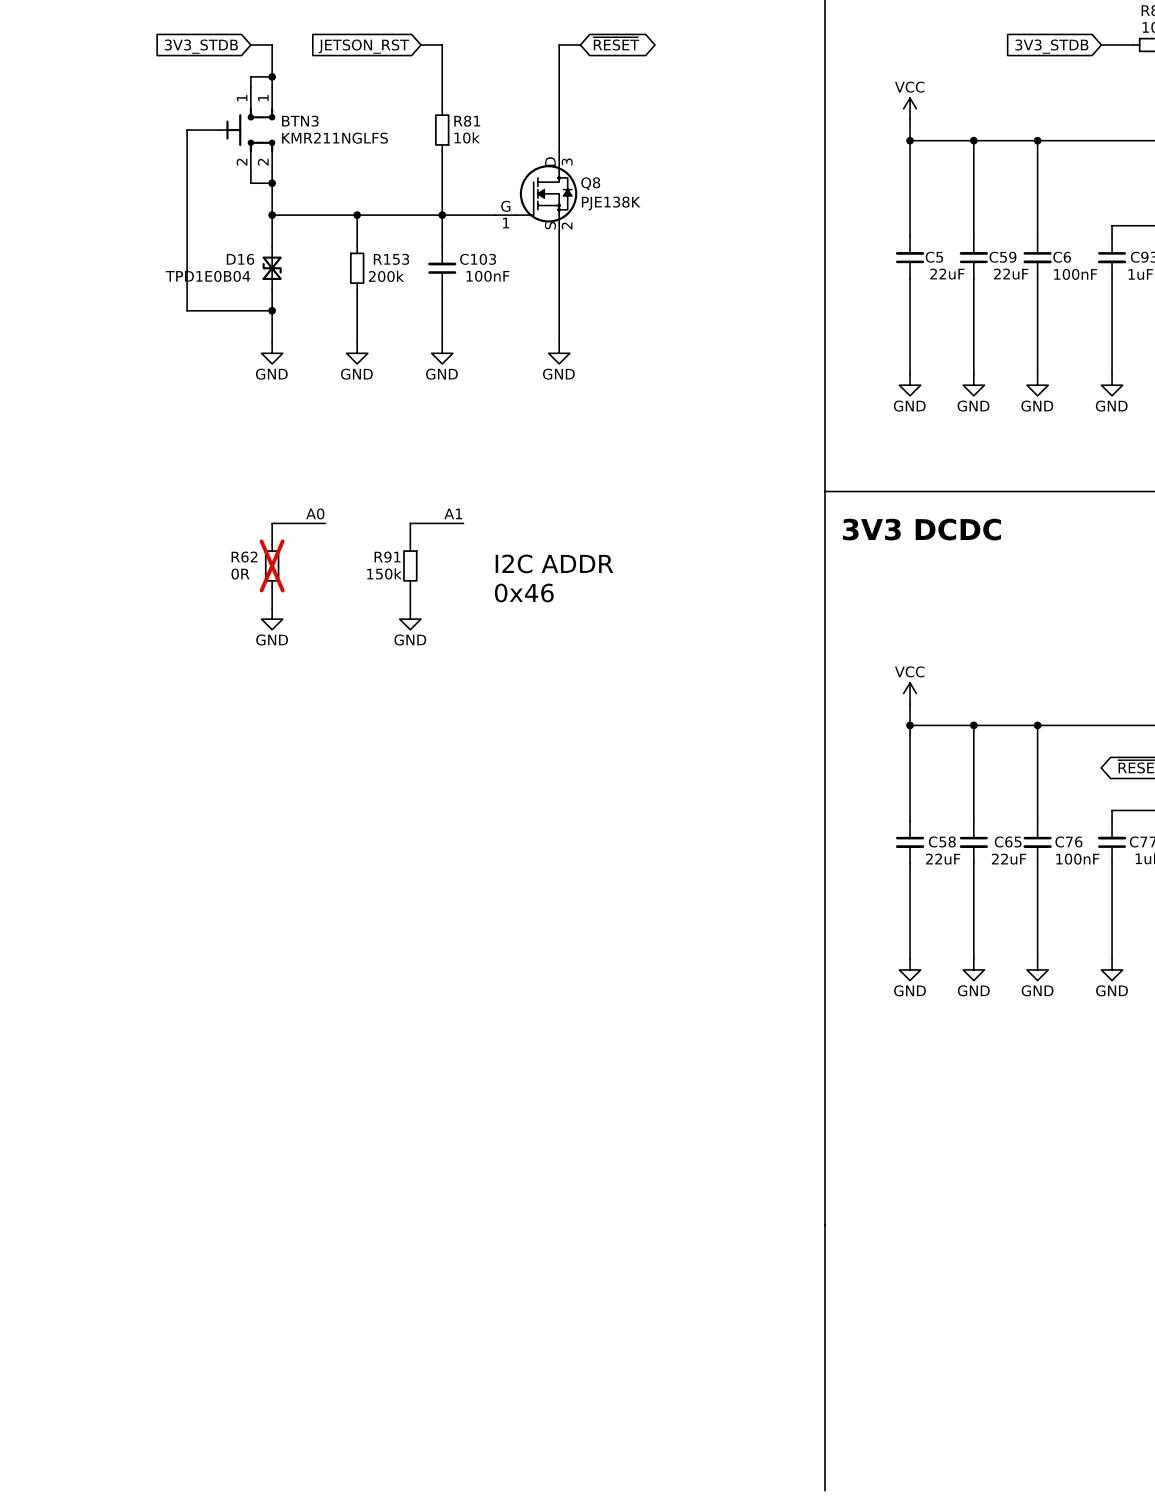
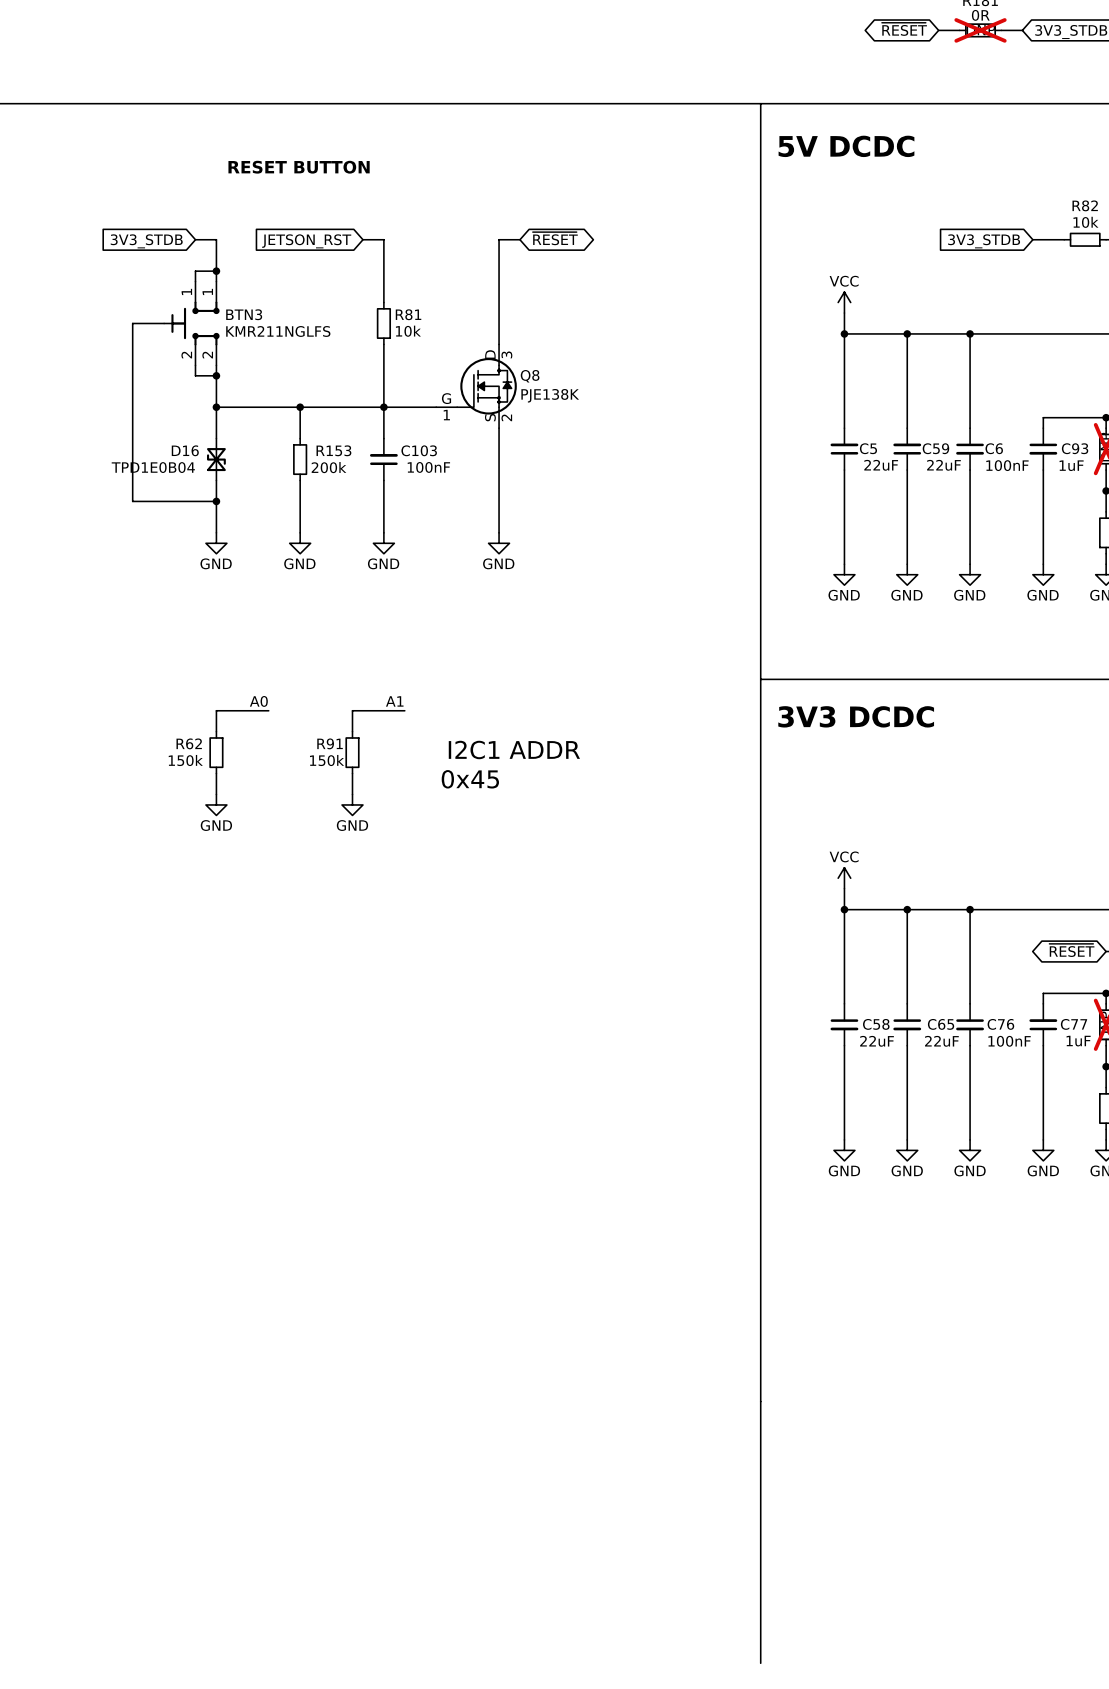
text: I2C ADDR (554, 563) -> I2C1 ADDR (514, 749)
R62 do-not-place cross: (272, 565) -> none
R62 value: 0R (240, 574) -> 150k (185, 760)
text: 0x46 (524, 593) -> 0x45 (470, 779)

